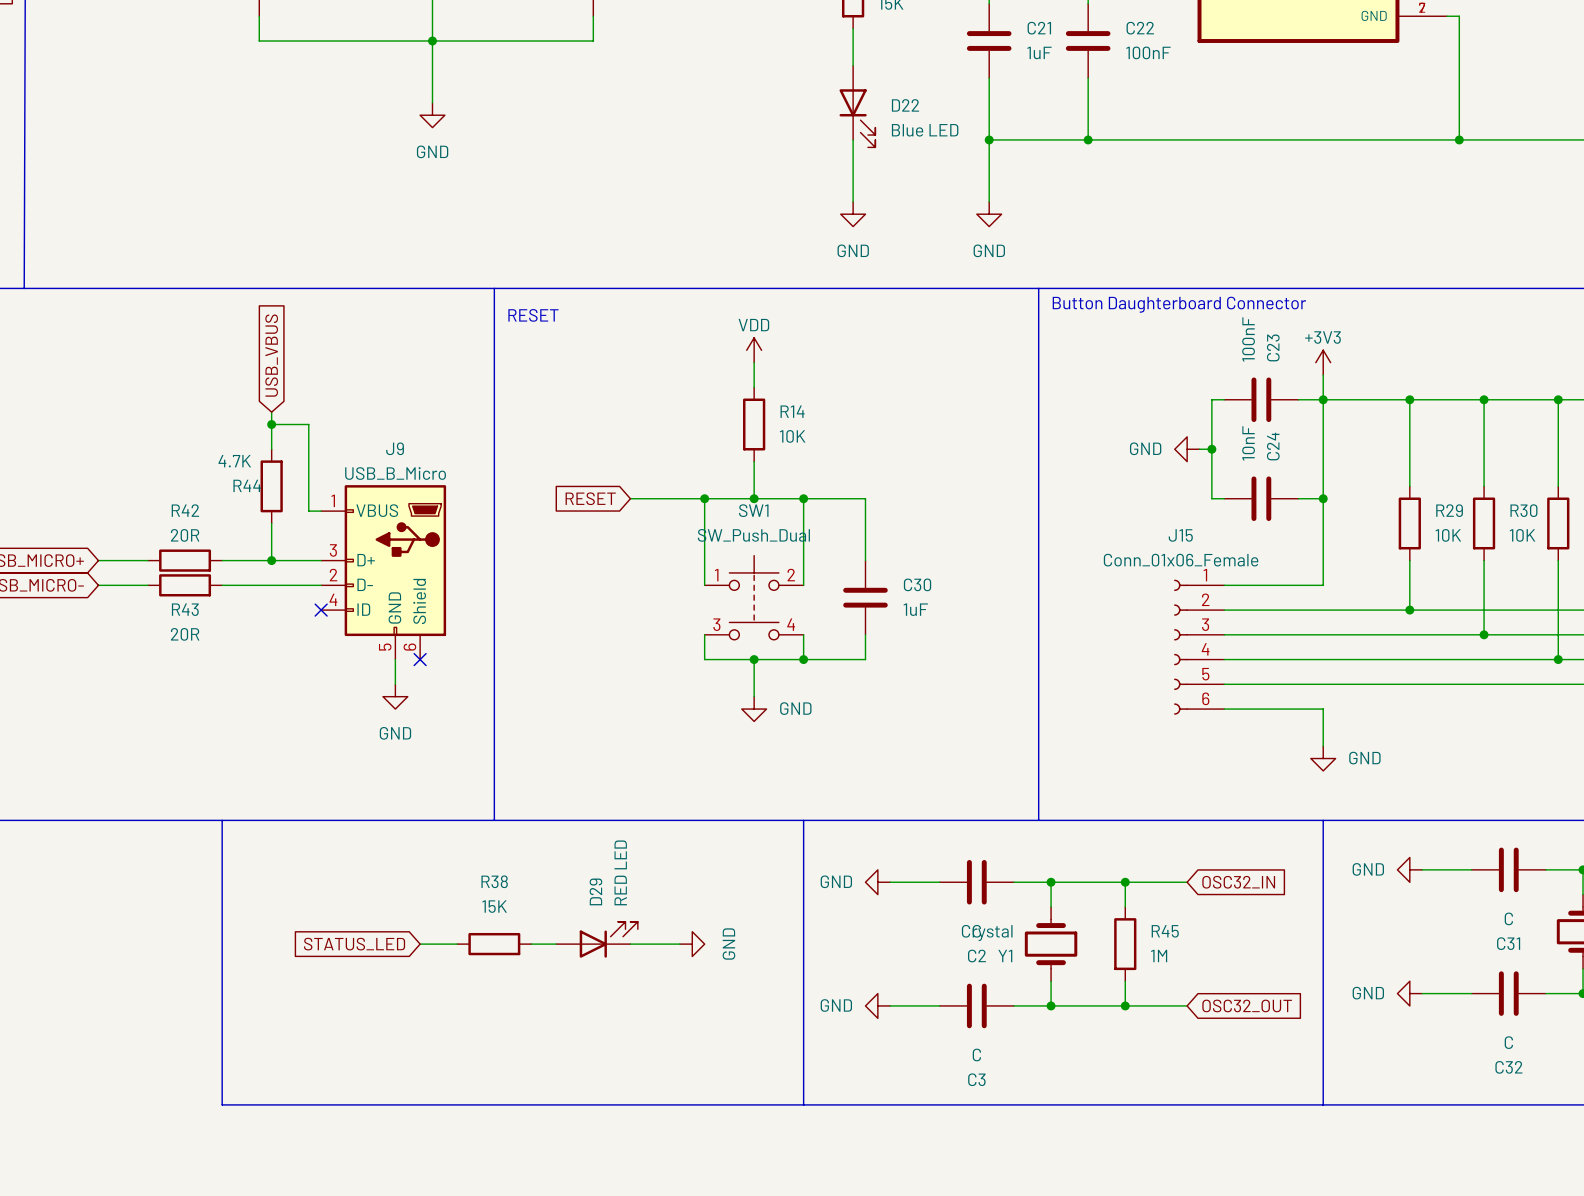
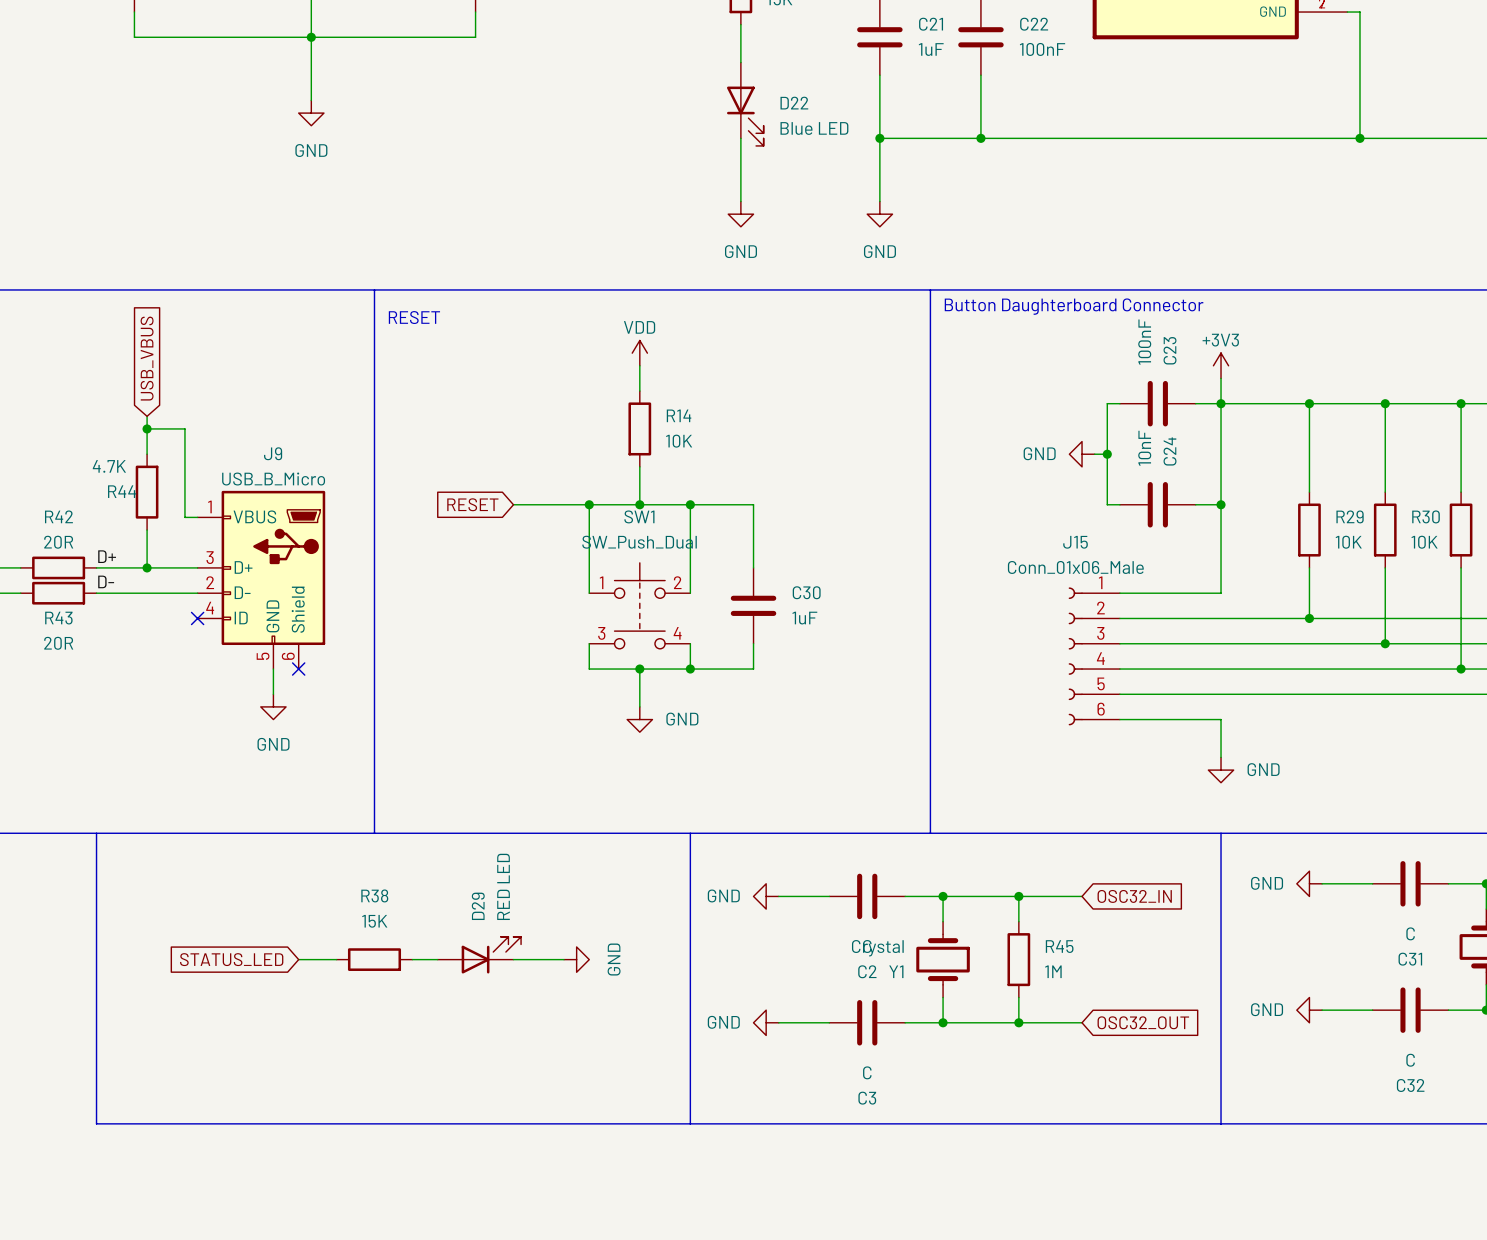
label: none -> D+ (107, 556)
J15 value: Conn_01x06_Female (1181, 560) -> Conn_01x06_Male (1075, 567)
label: none -> D- (106, 581)

